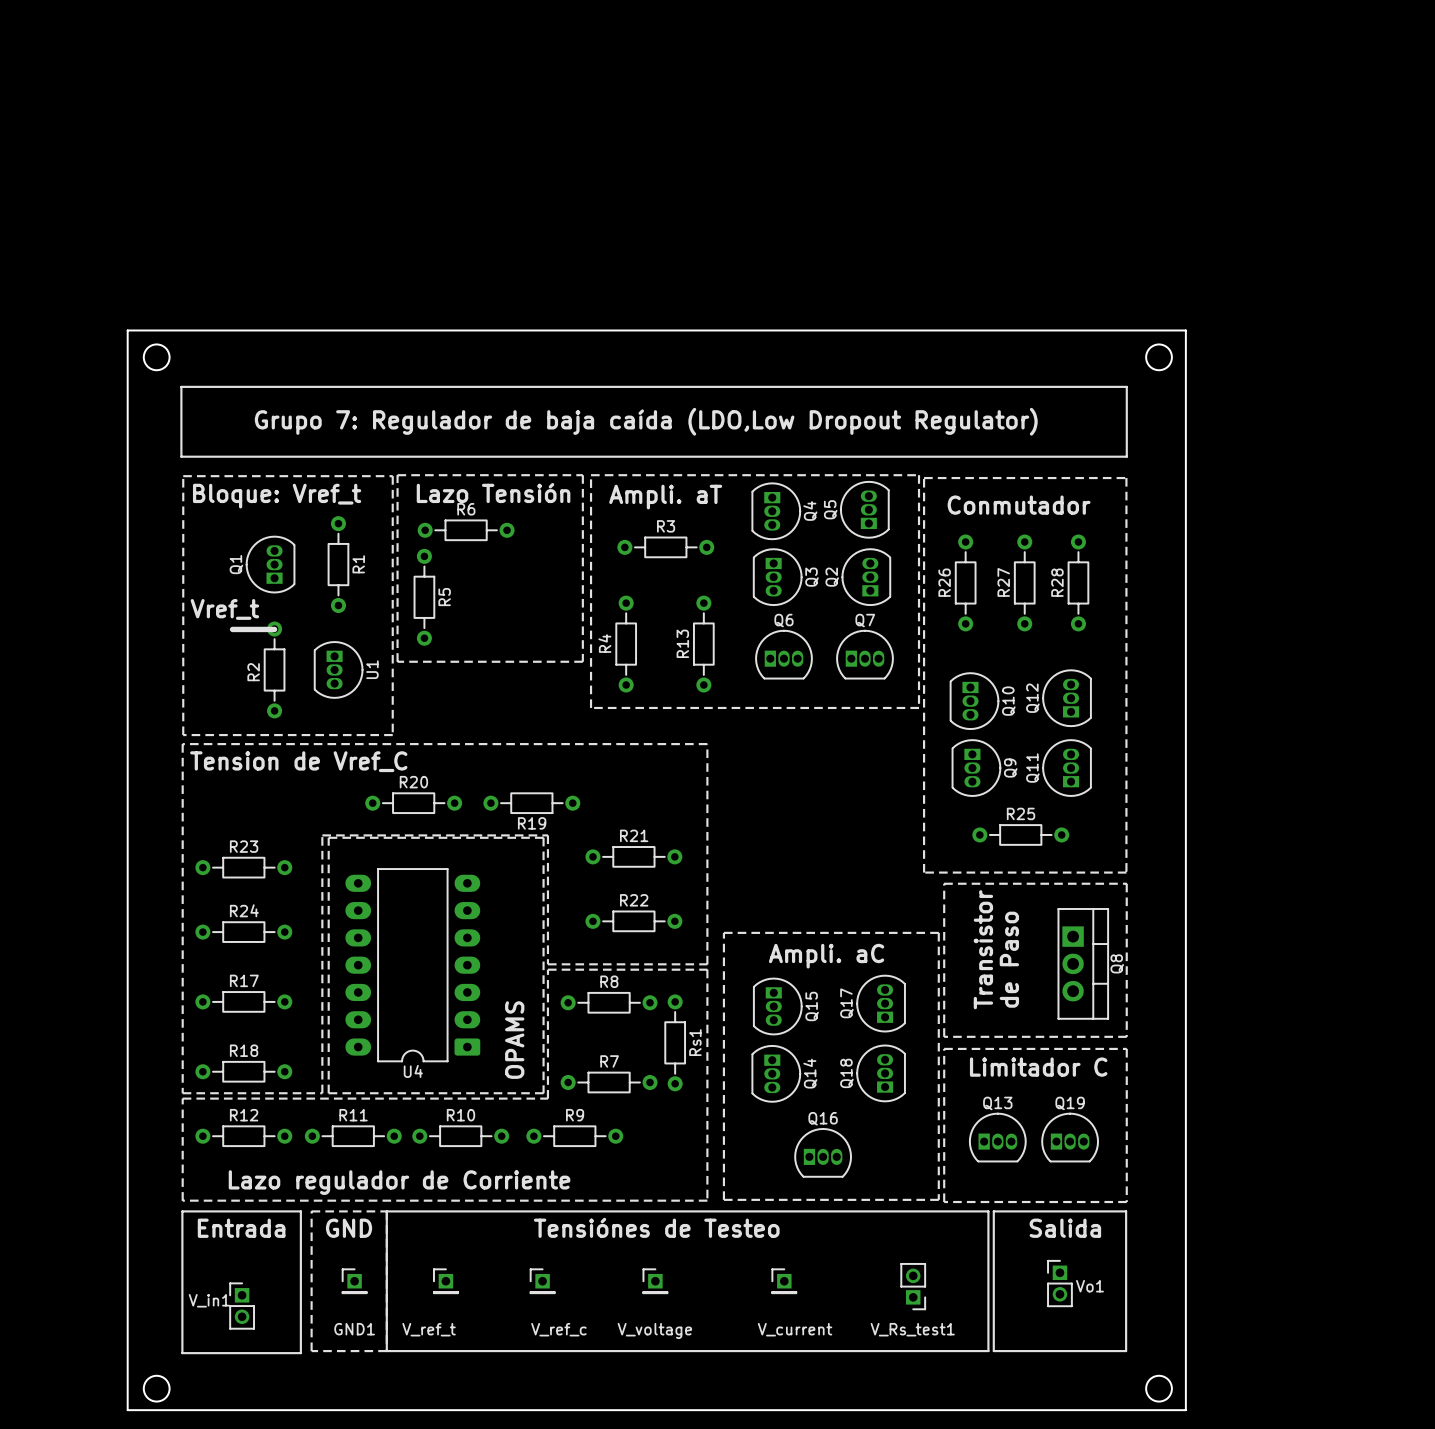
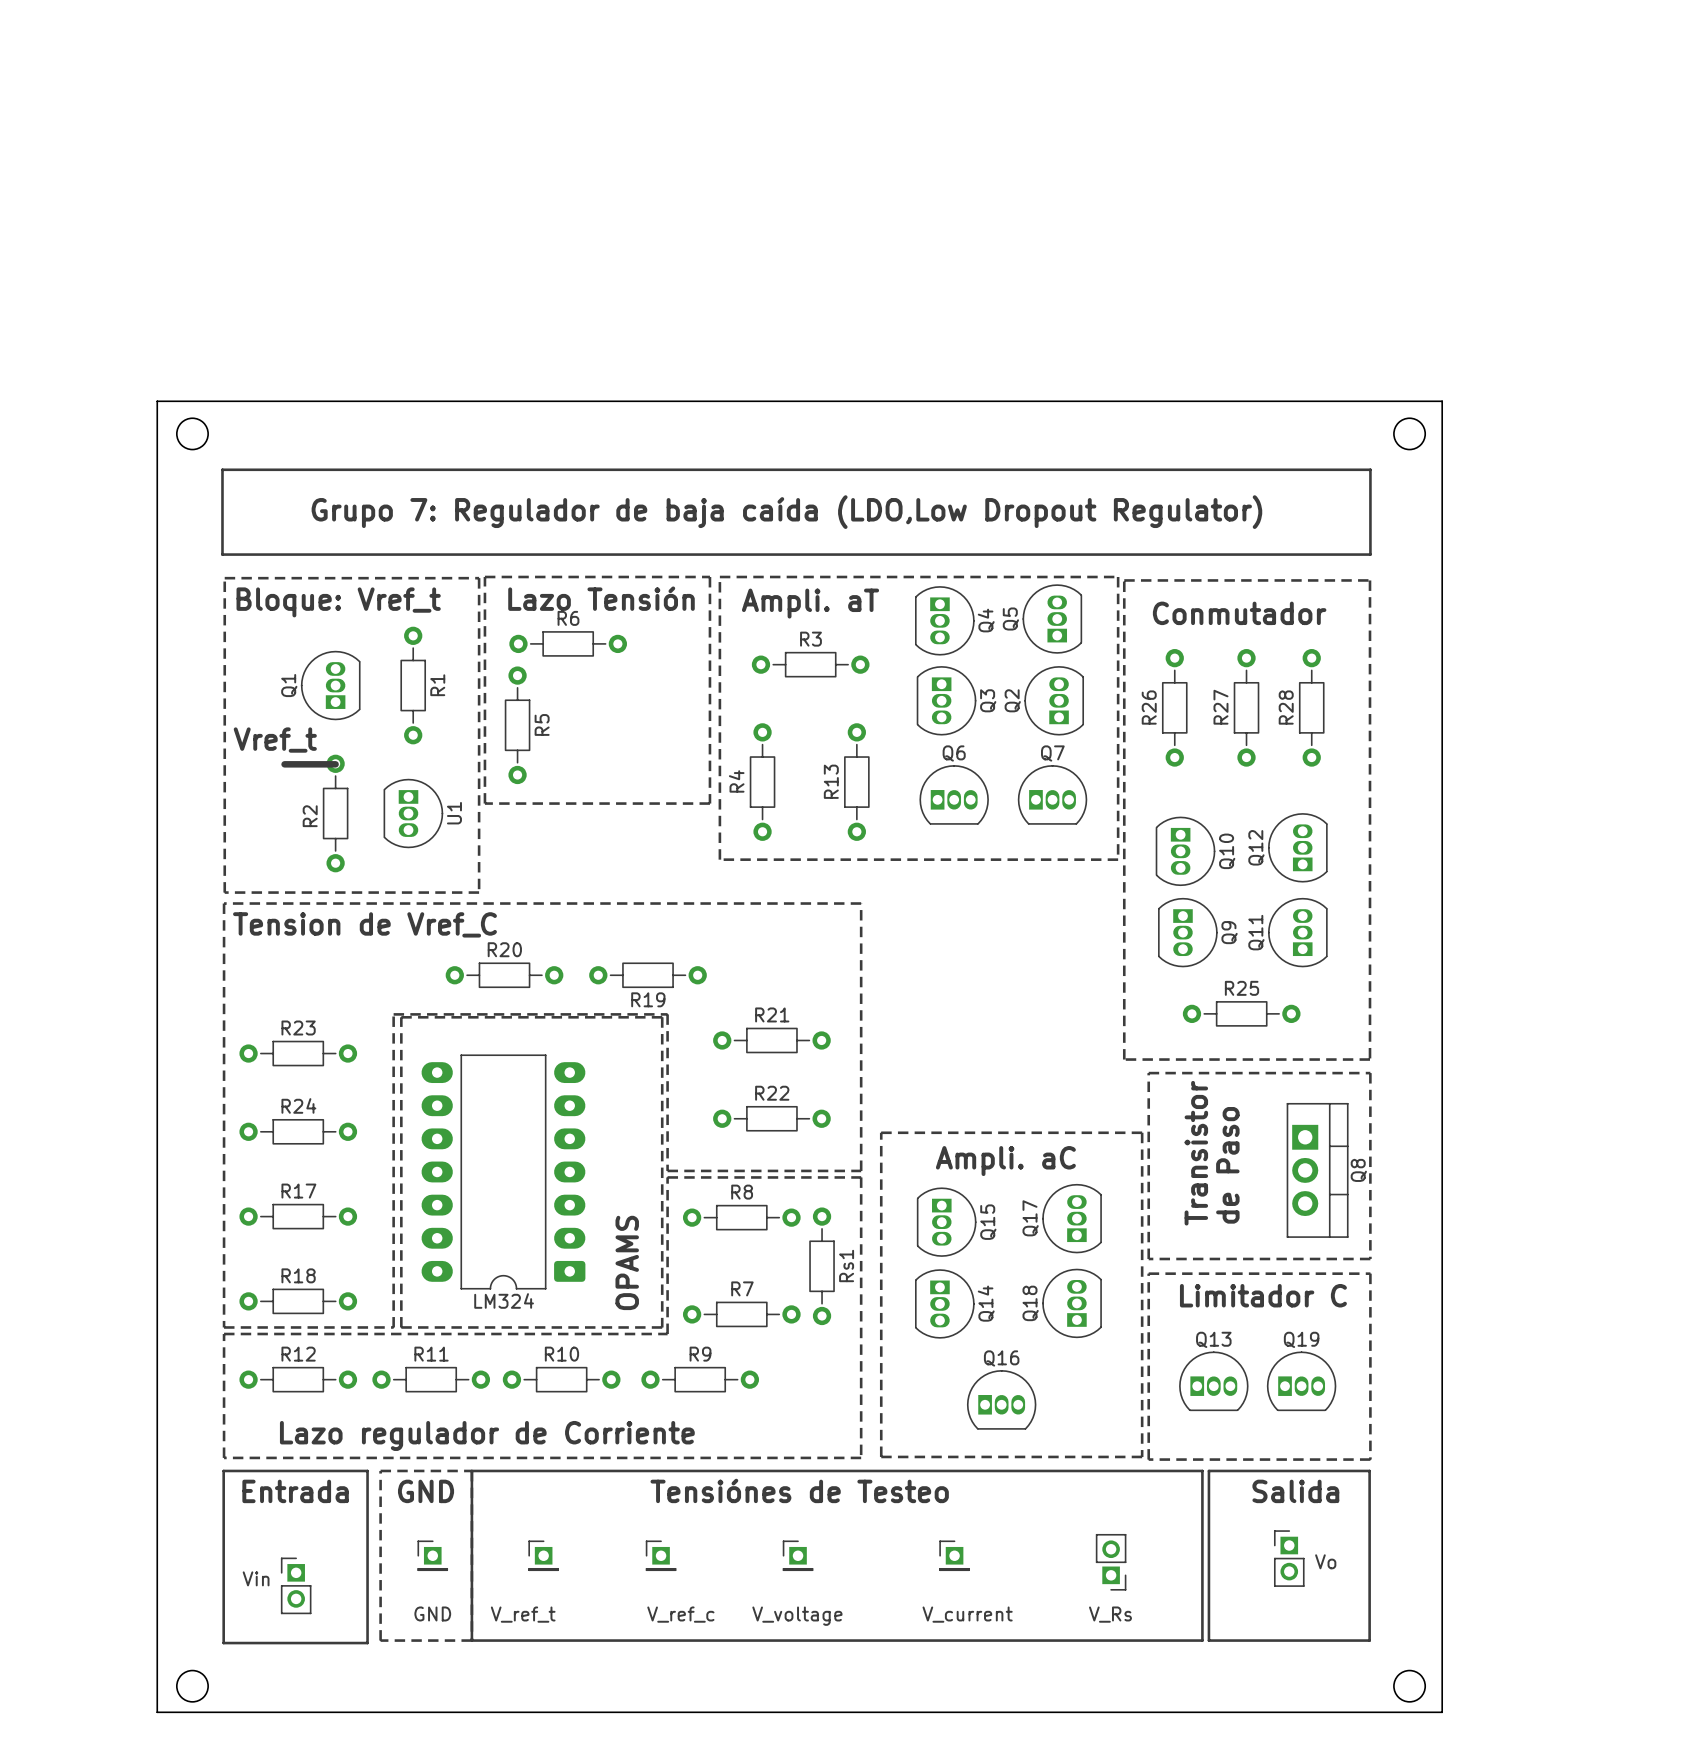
U4 name: U4 (413, 1071) -> LM324 (504, 1300)
Vo1 name: Vo1 (1089, 1286) -> Vo (1325, 1561)
V_in1 name: V_in1 (209, 1300) -> Vin (256, 1578)
GND1 name: GND1 (354, 1329) -> GND (432, 1613)
V_Rs_test1 name: V_Rs_test1 (912, 1329) -> V_Rs (1110, 1614)

